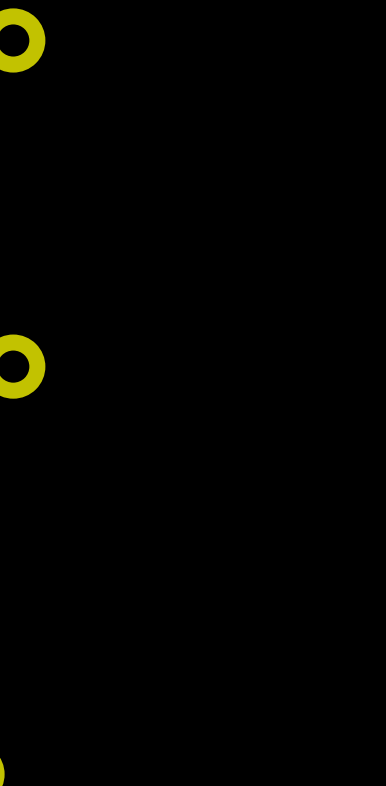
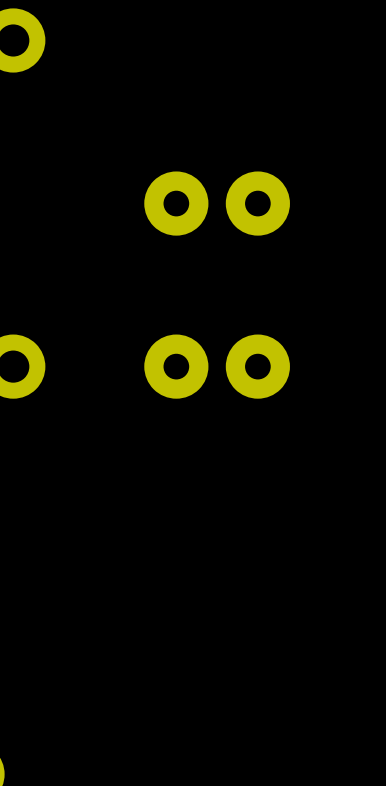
part: none -> (217, 203)
part: none -> (217, 366)

